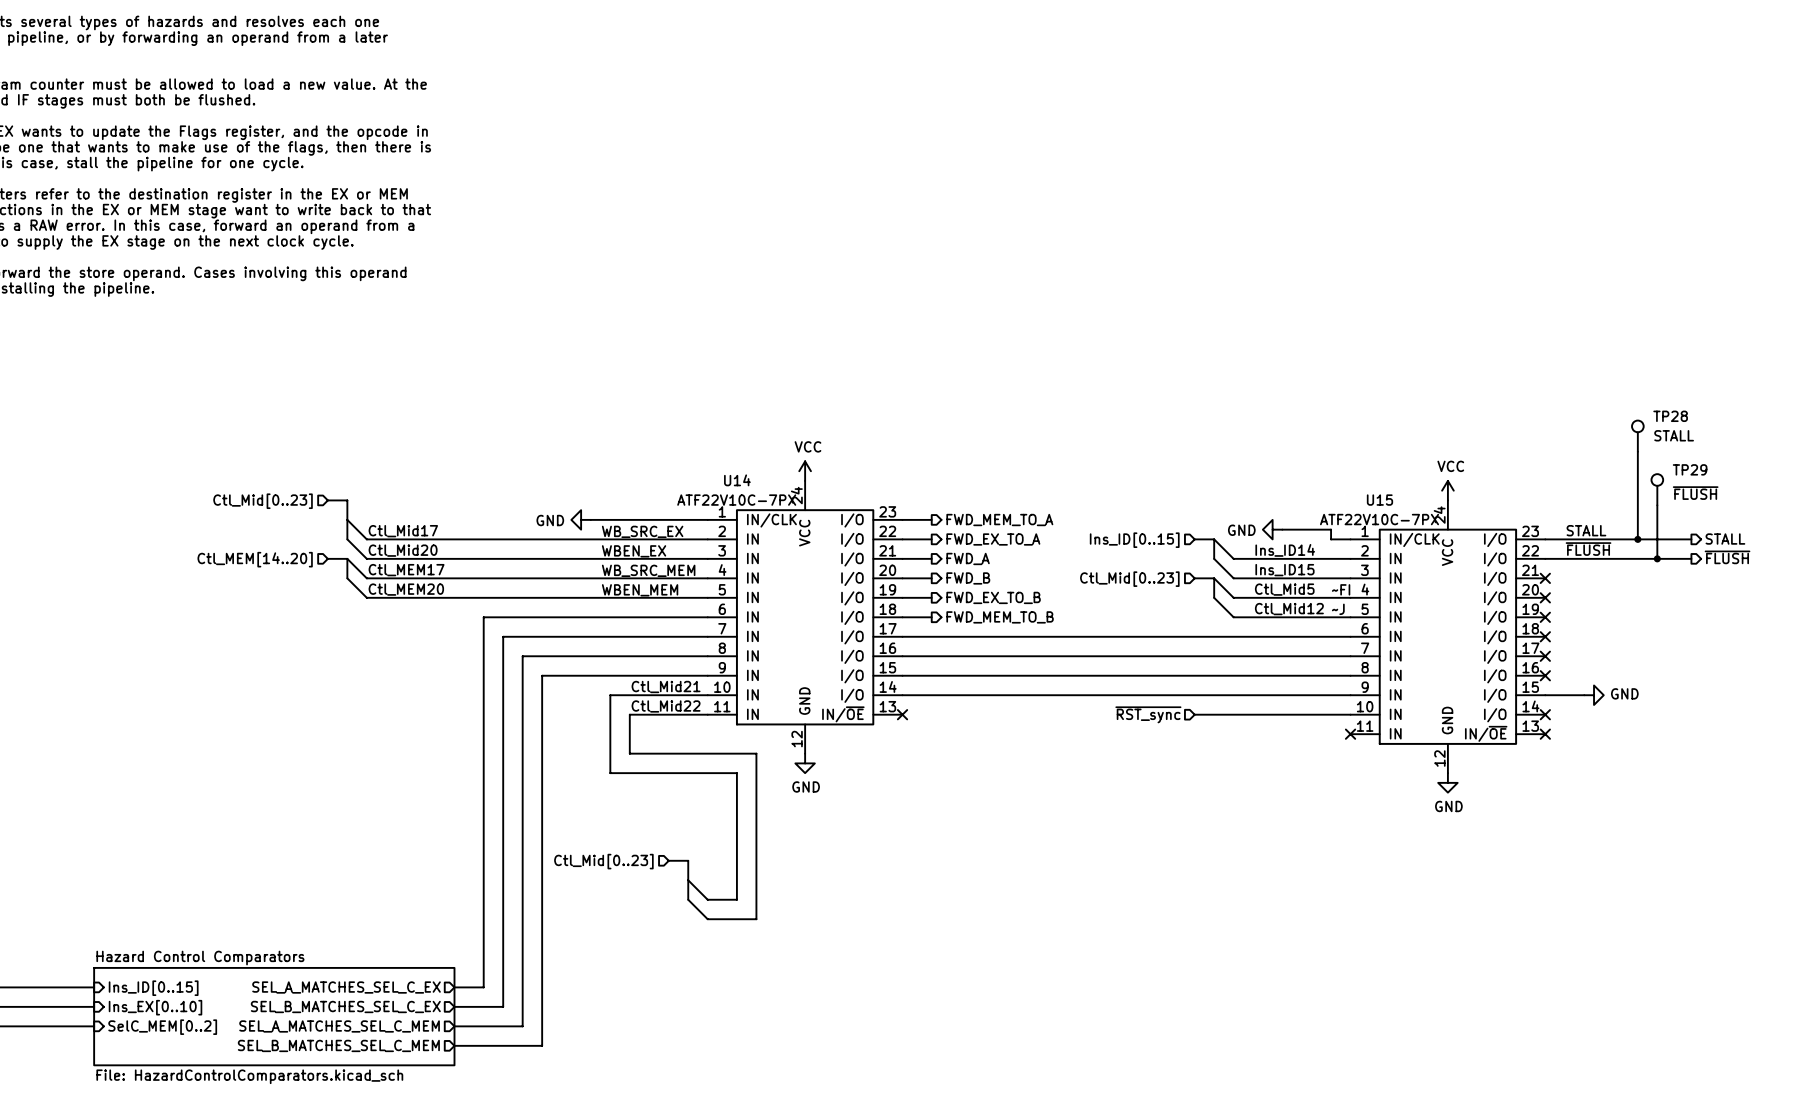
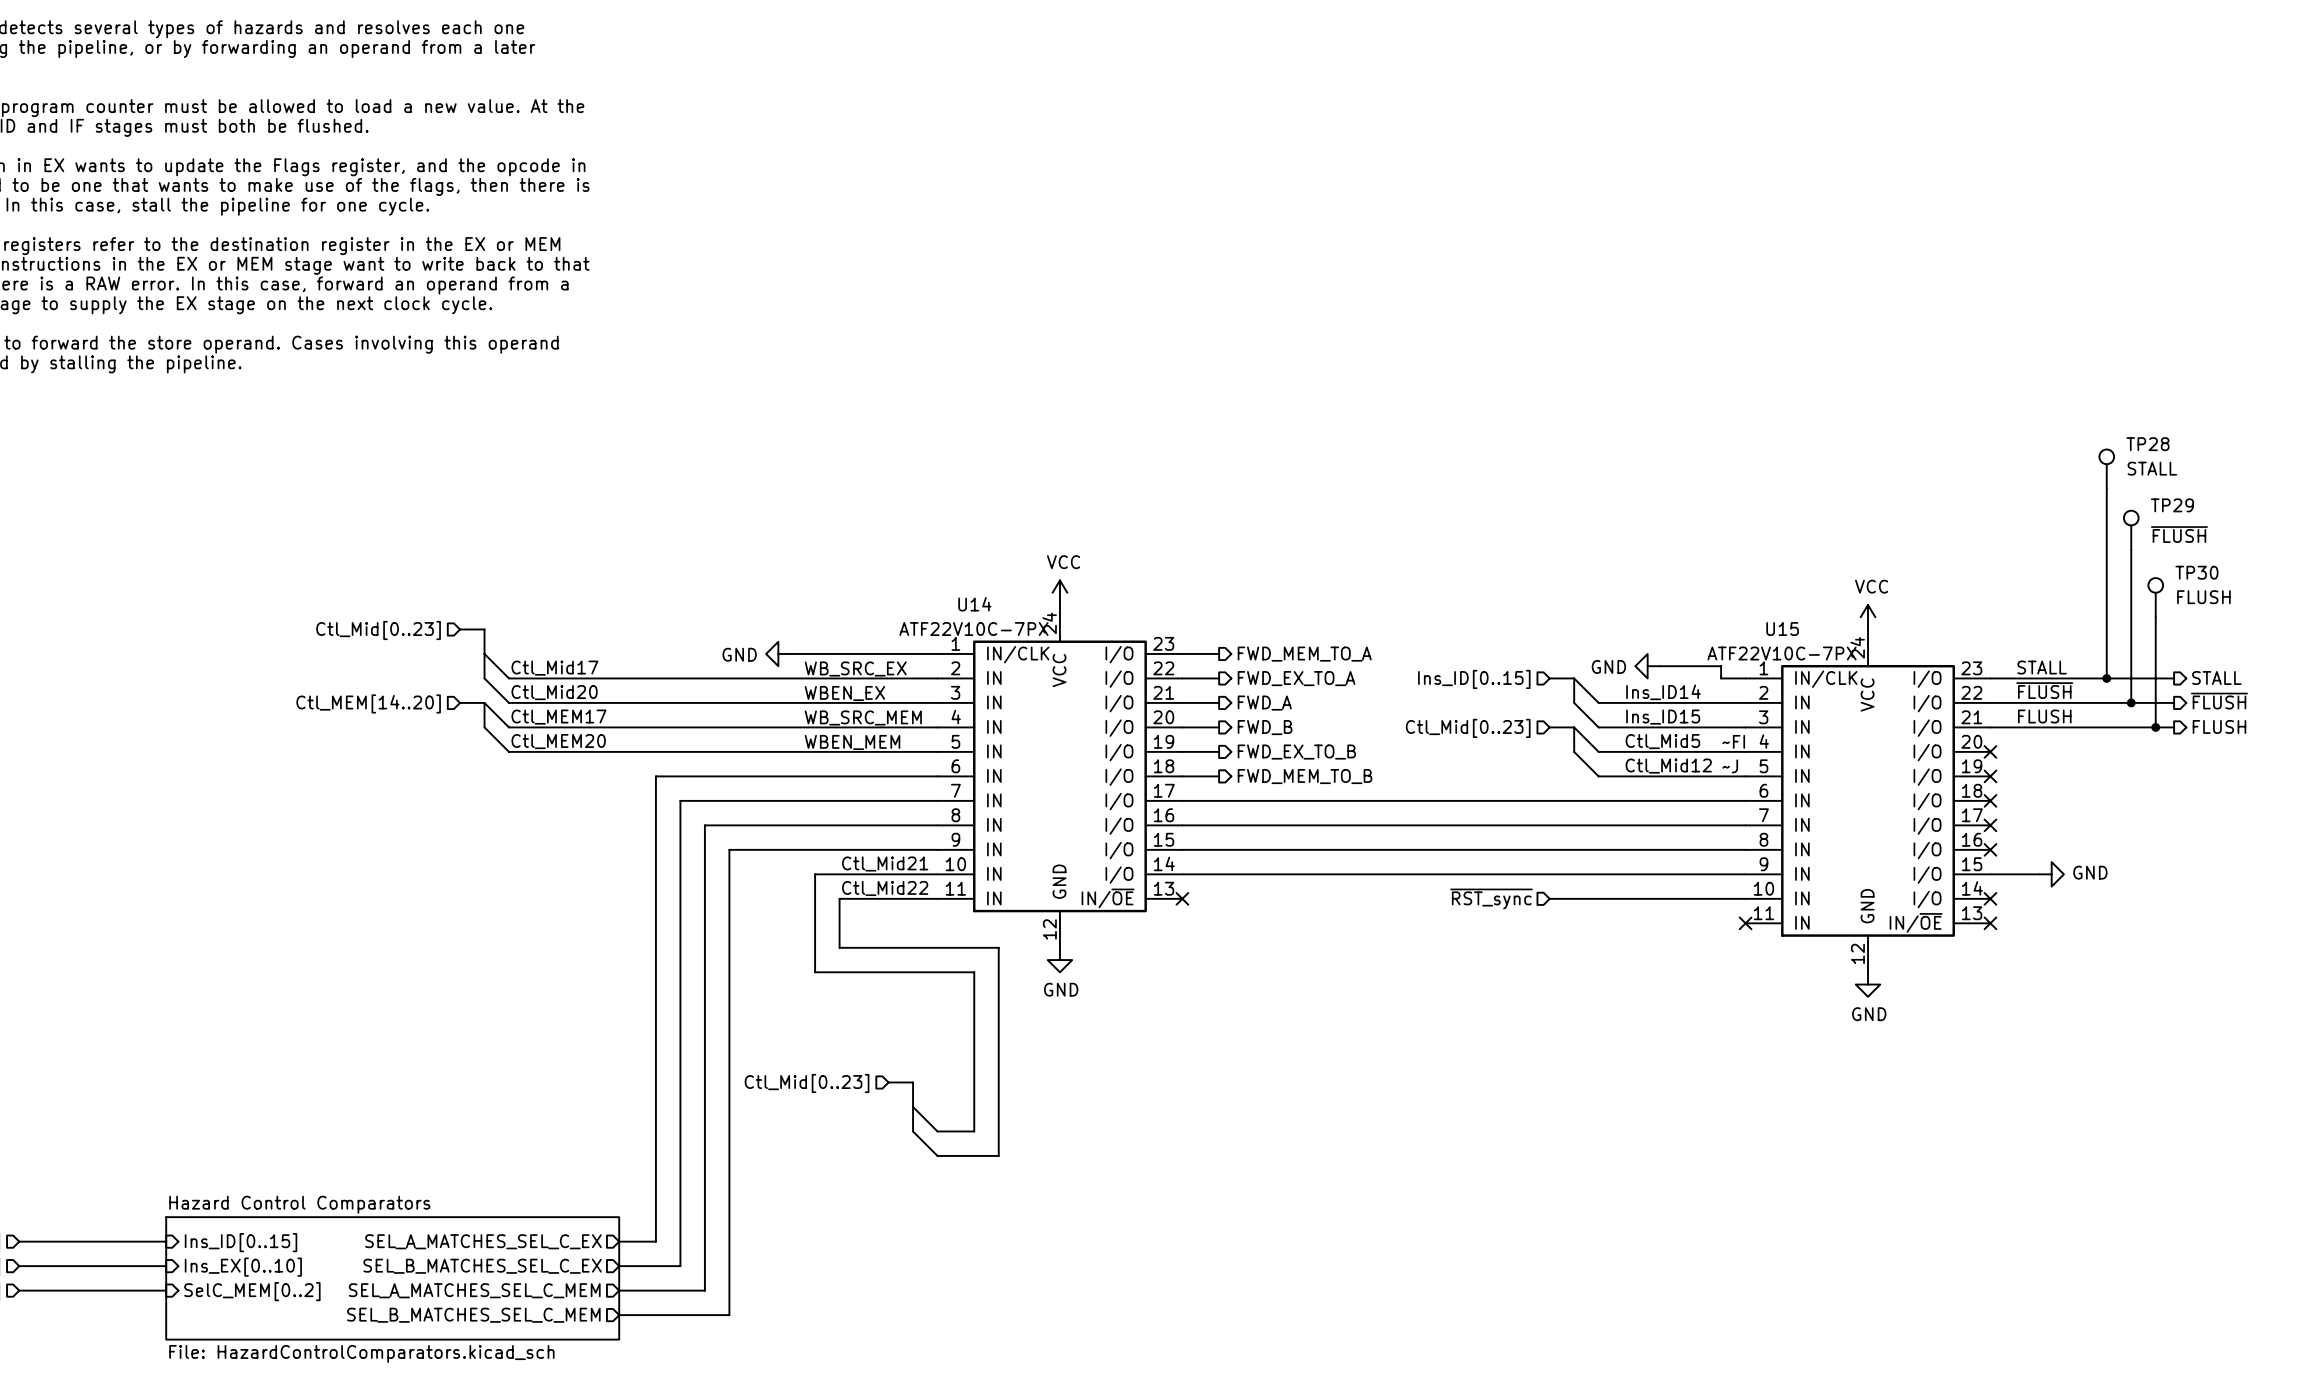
wire: none -> (2106, 488) (2106, 568)
TP28 position: (1637, 436) -> (2106, 469)
wire: none -> (2131, 549) (2131, 635)
TP30: none -> FLUSH (2155, 597)
TP29 position: (1657, 489) -> (2131, 530)
wire: none -> (2155, 617) (2155, 727)
label: none -> FLUSH (2044, 716)
hierarchical label: none -> FLUSH (2219, 726)
wire: none -> (1990, 727) (2174, 727)
no-connect mark: (1545, 578) -> none
junction: none -> (2155, 727)

